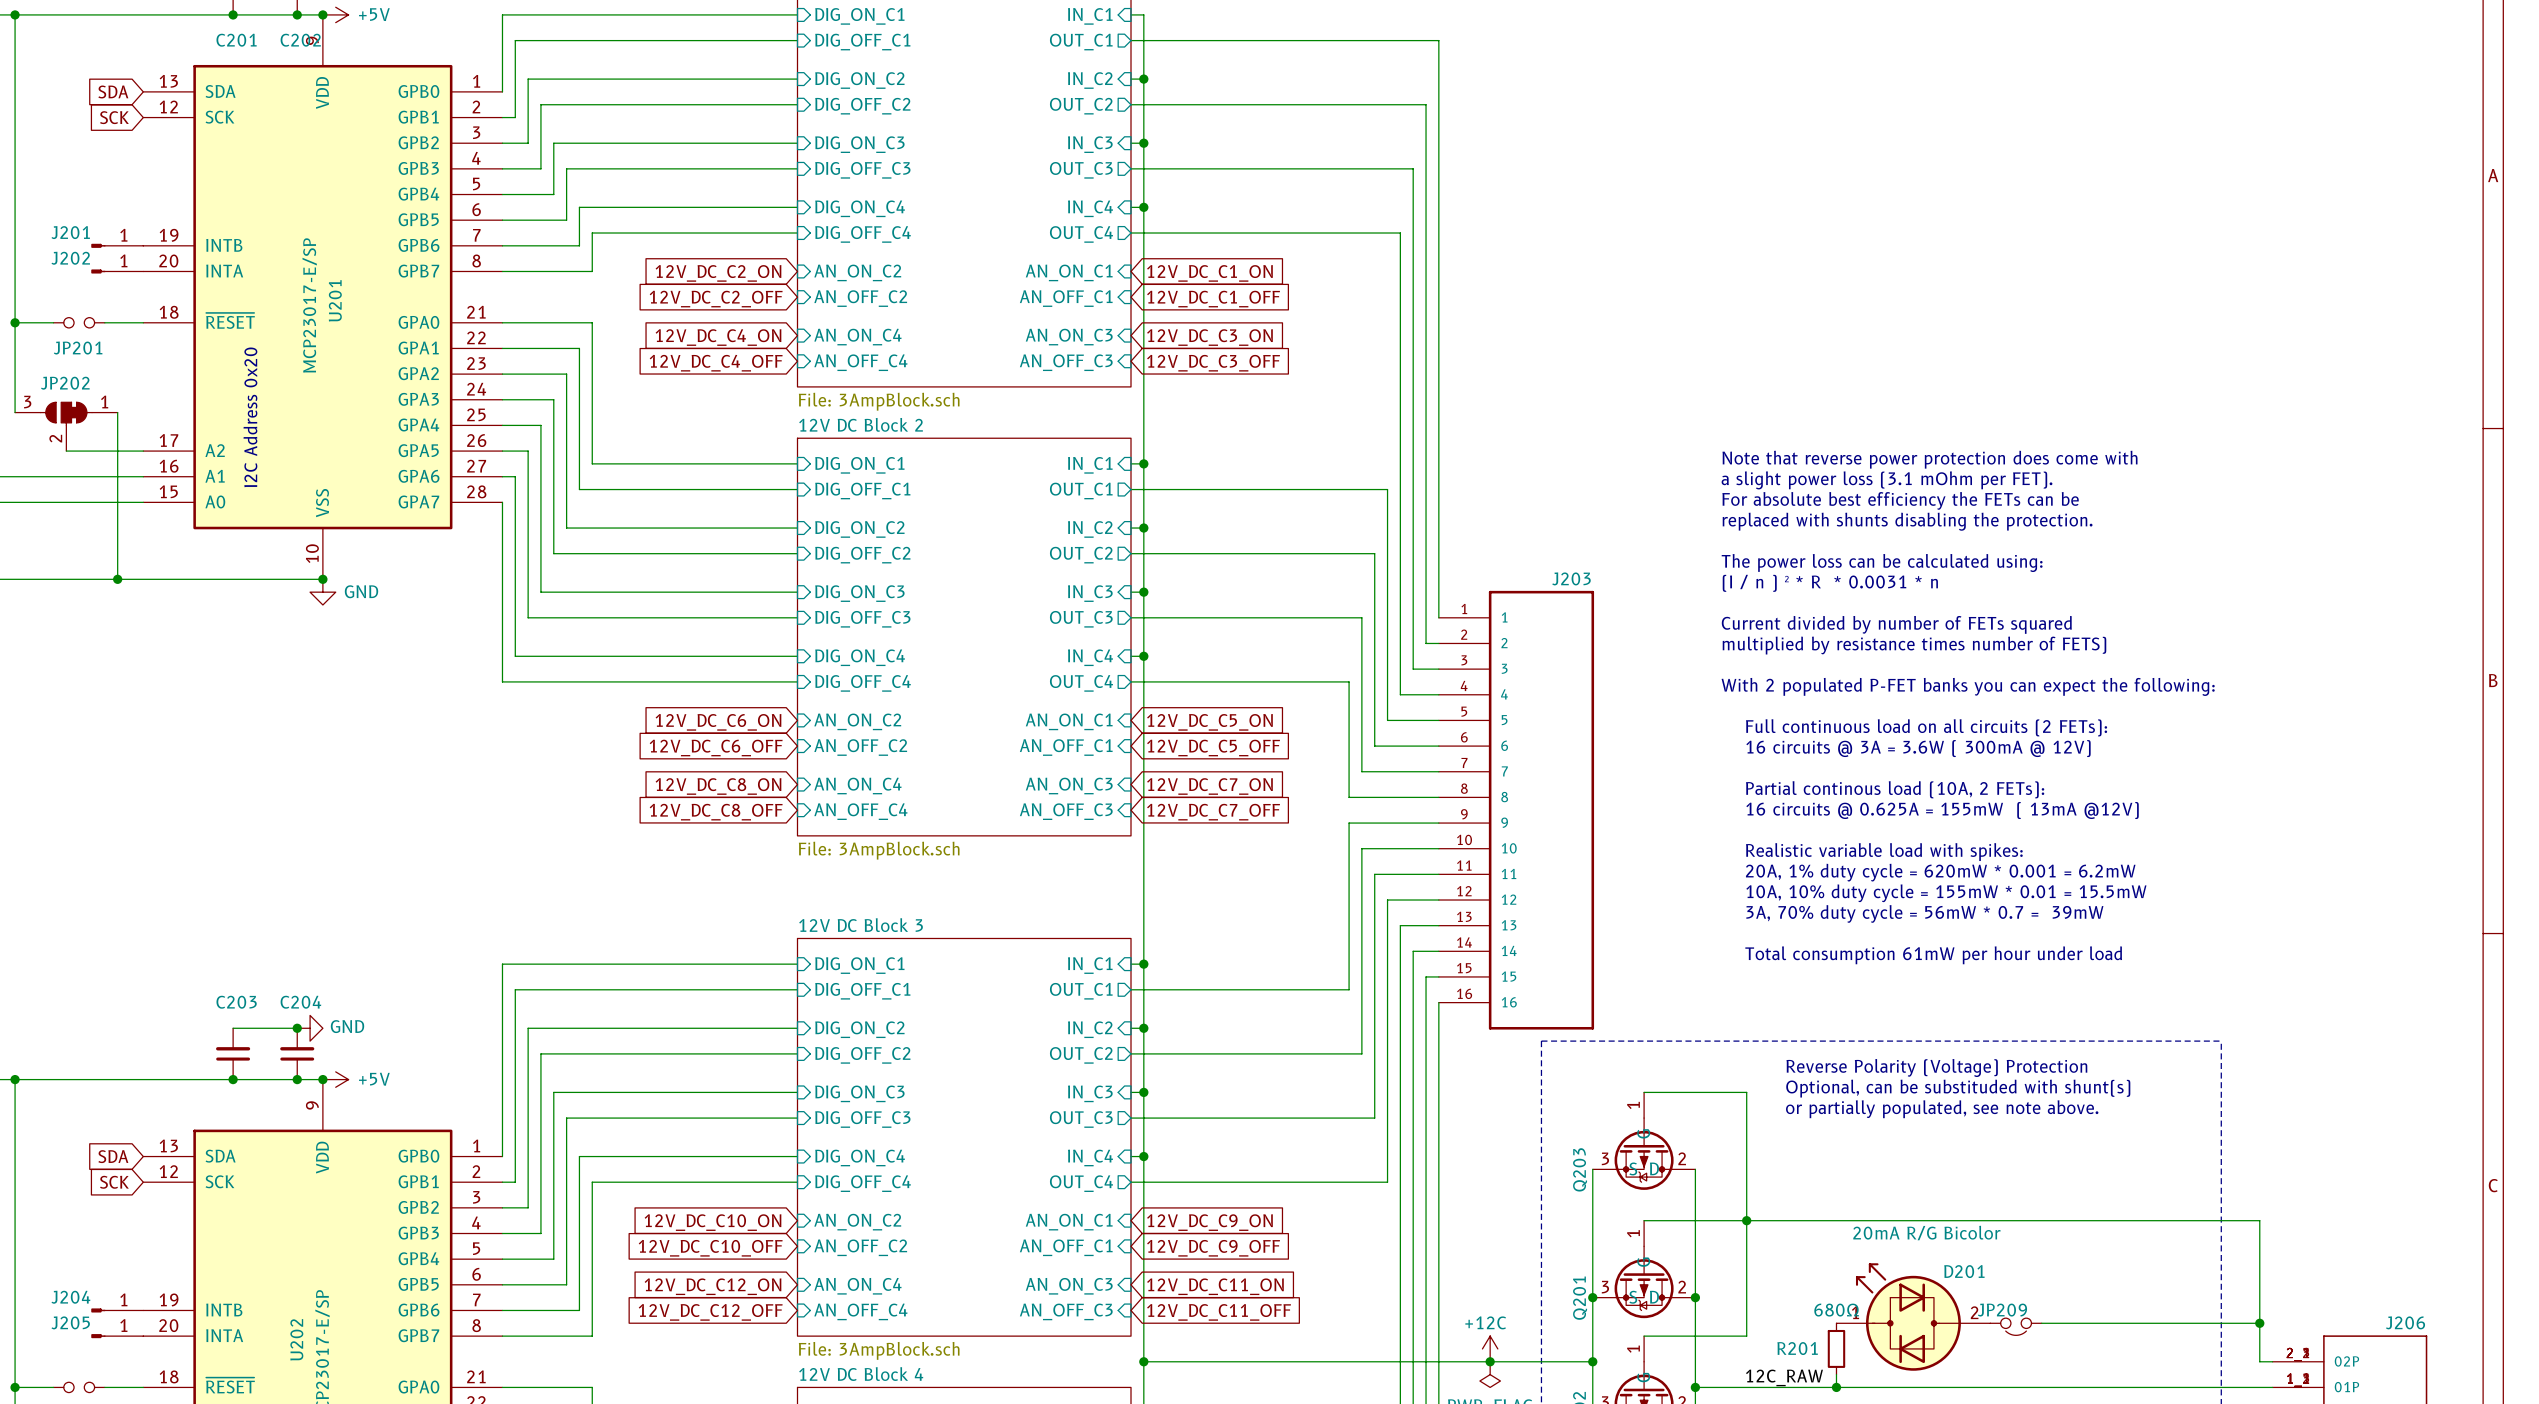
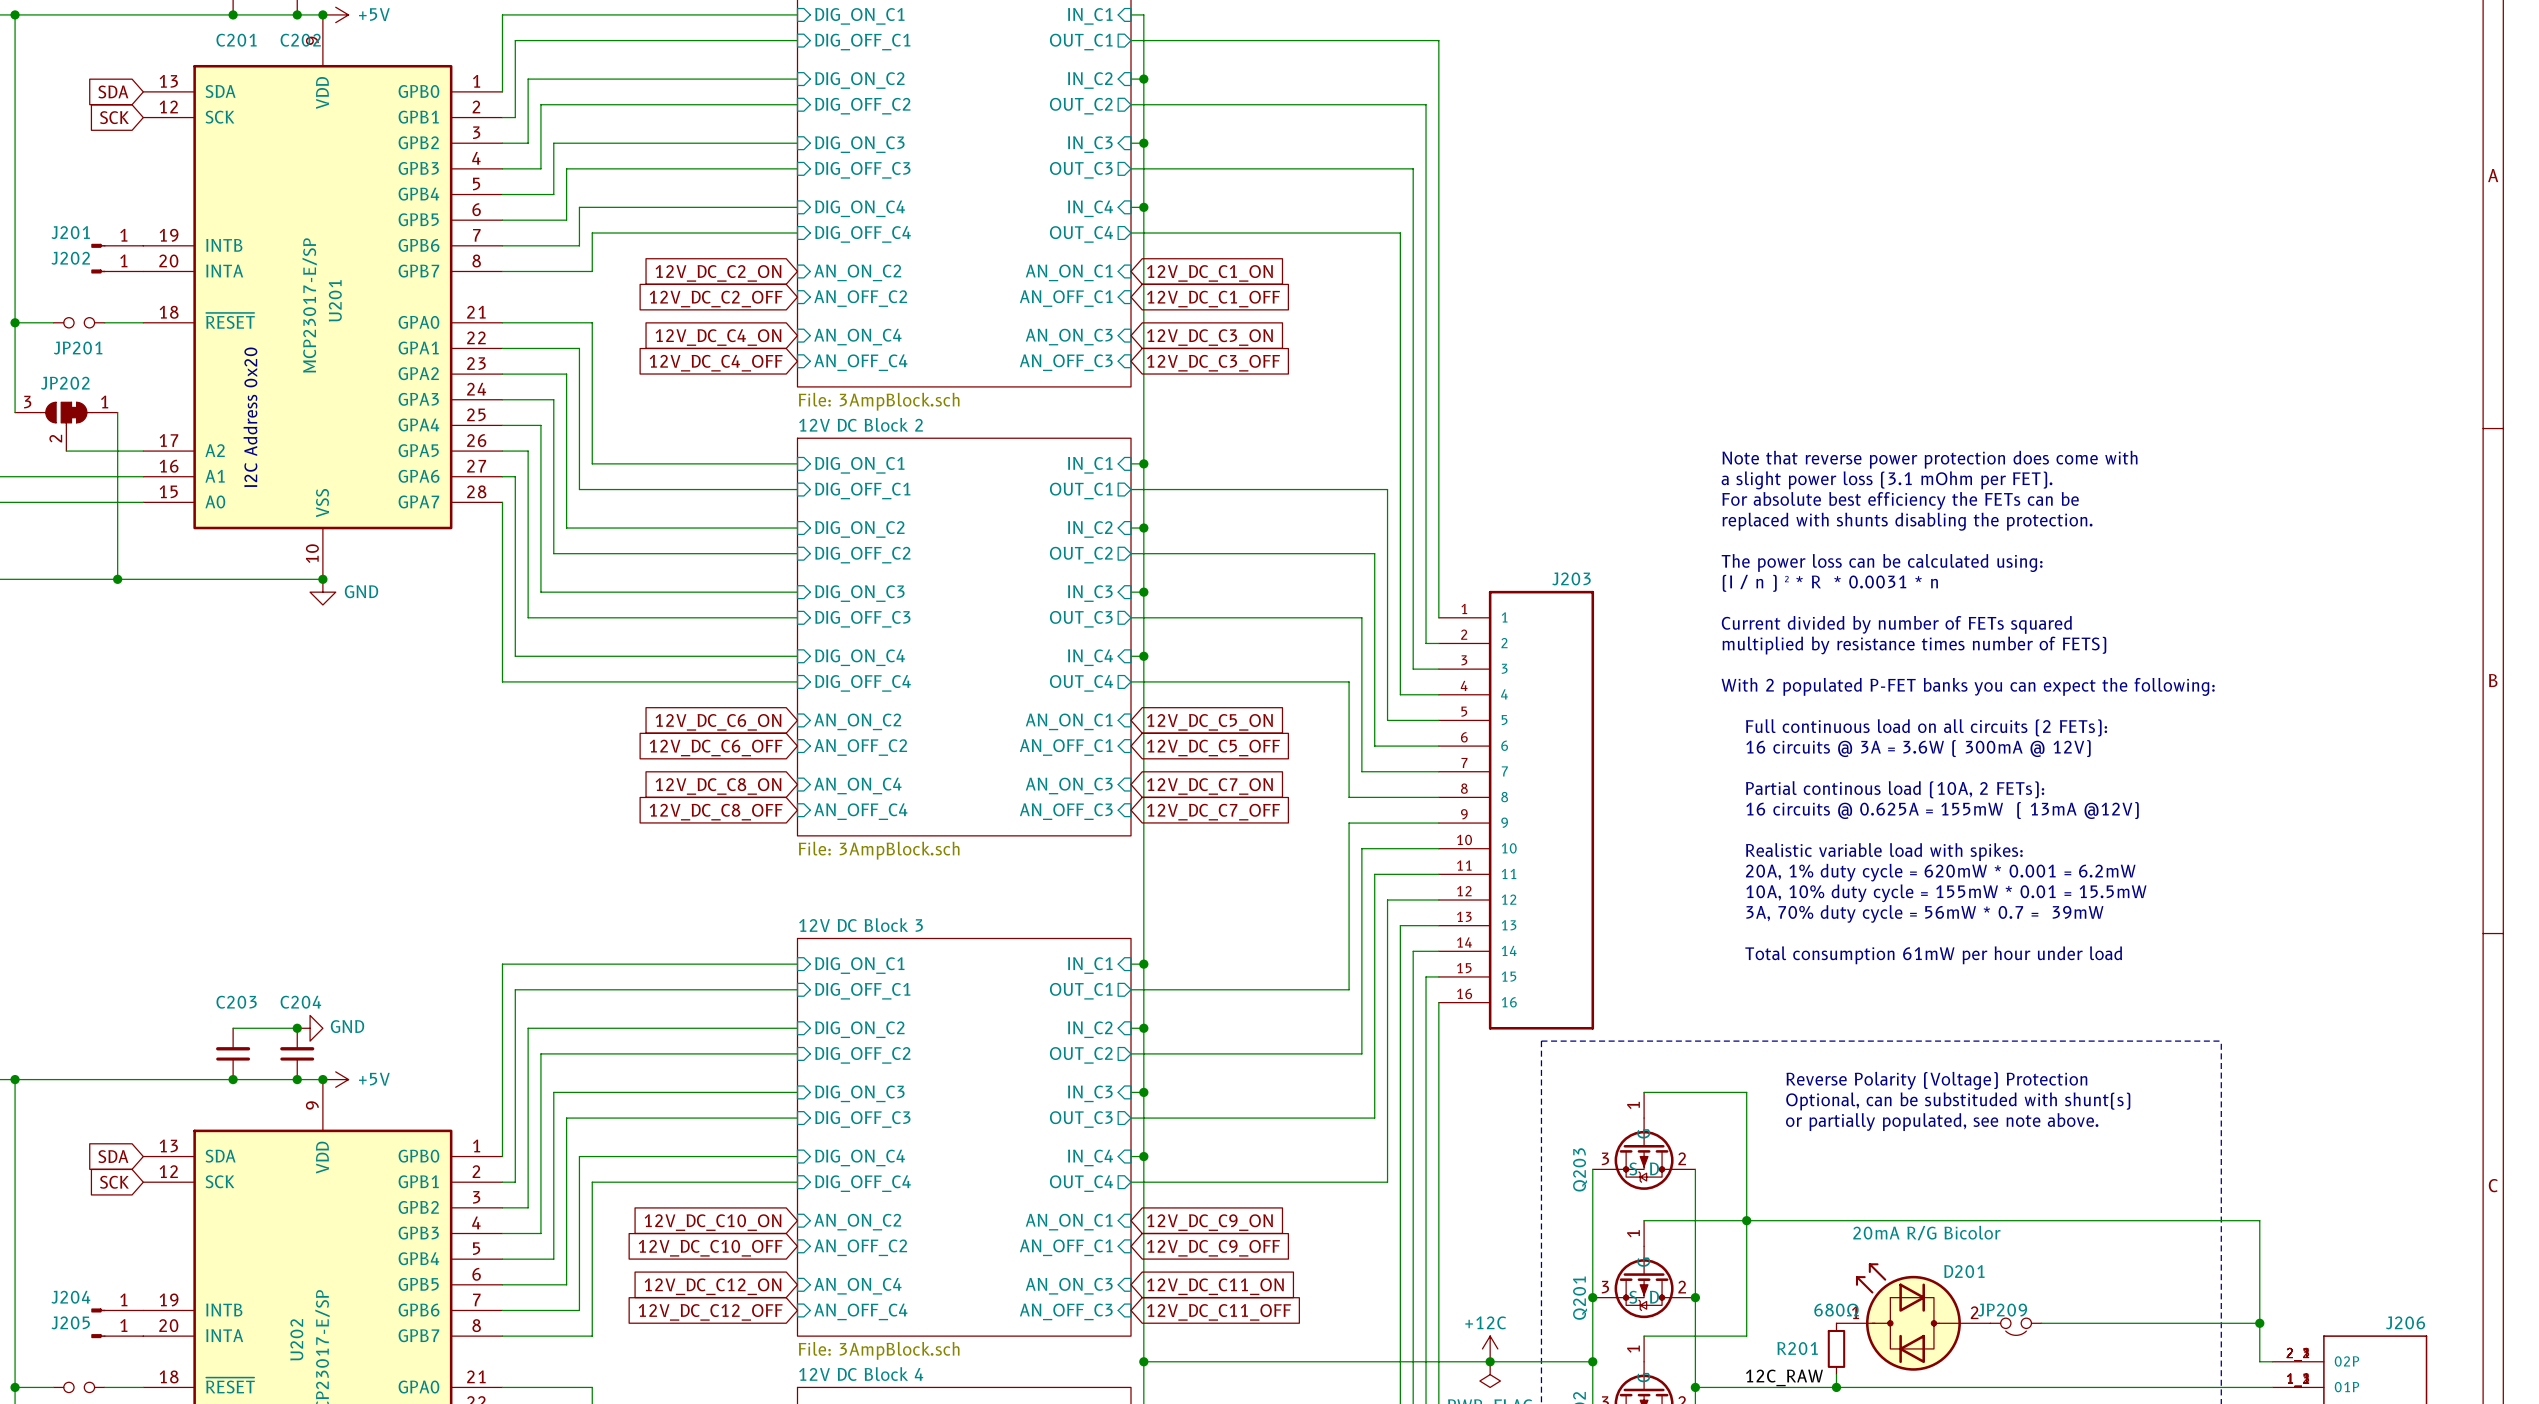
text position: Reverse Polarity (Voltage) Protection (1936, 1068) -> Reverse Polarity (Voltage) Protection (1936, 1080)
text position: Optional, can be substituded with shunt(s) (1958, 1088) -> Optional, can be substituded with shunt(s) (1958, 1101)
text position: or partially populated, see note above. (1942, 1109) -> or partially populated, see note above. (1942, 1122)

